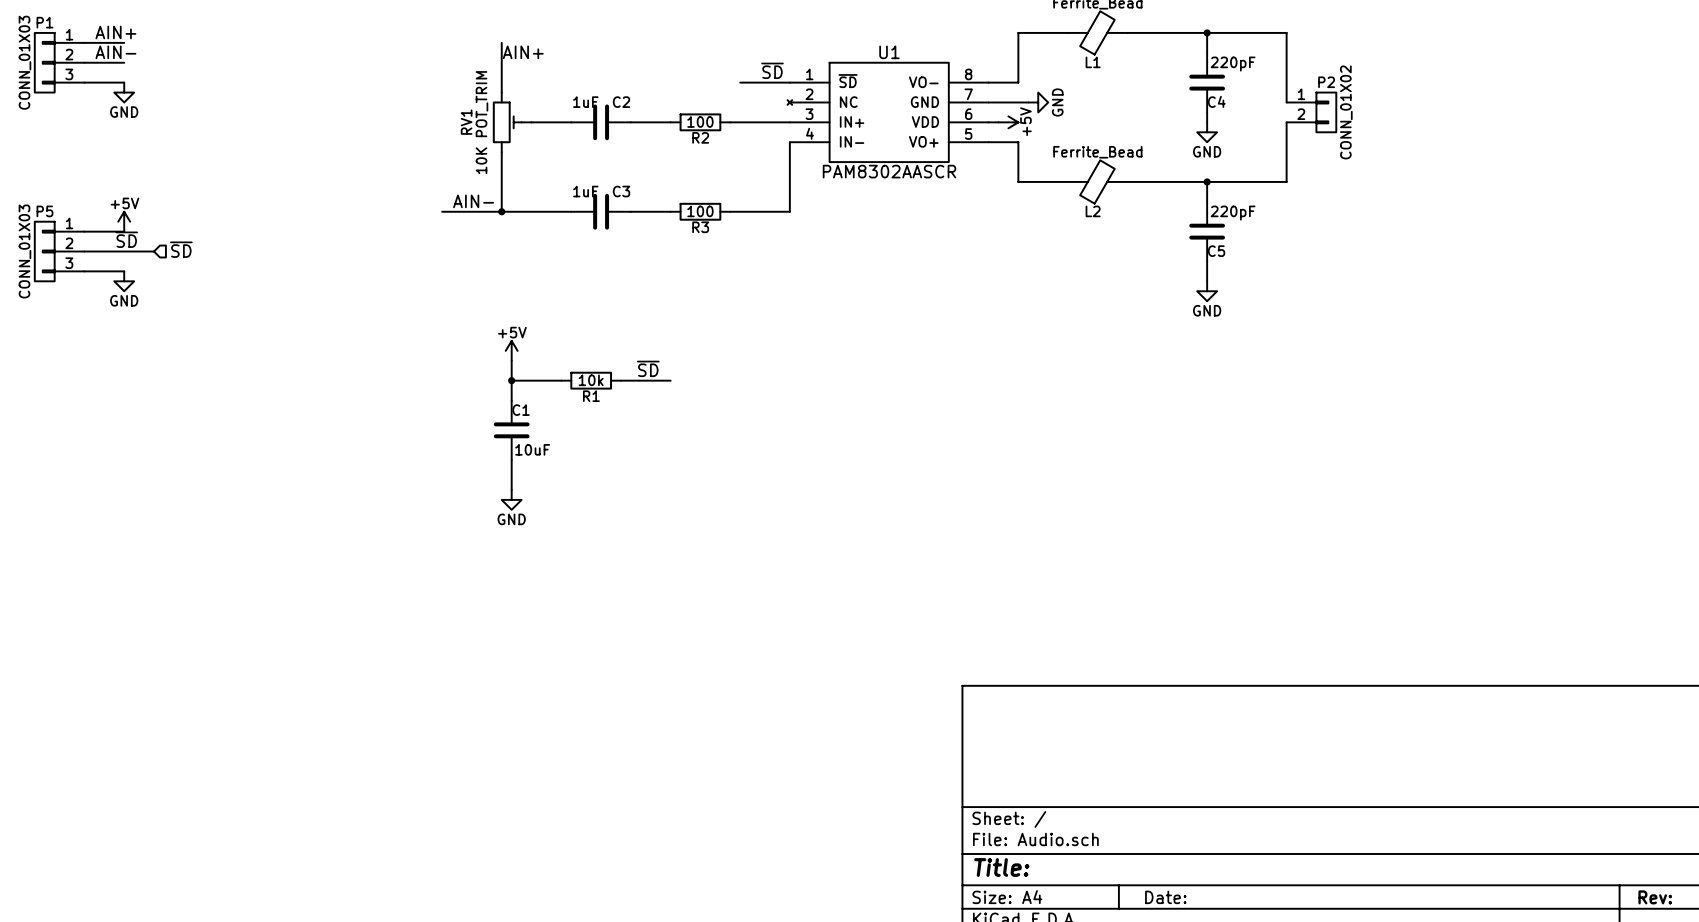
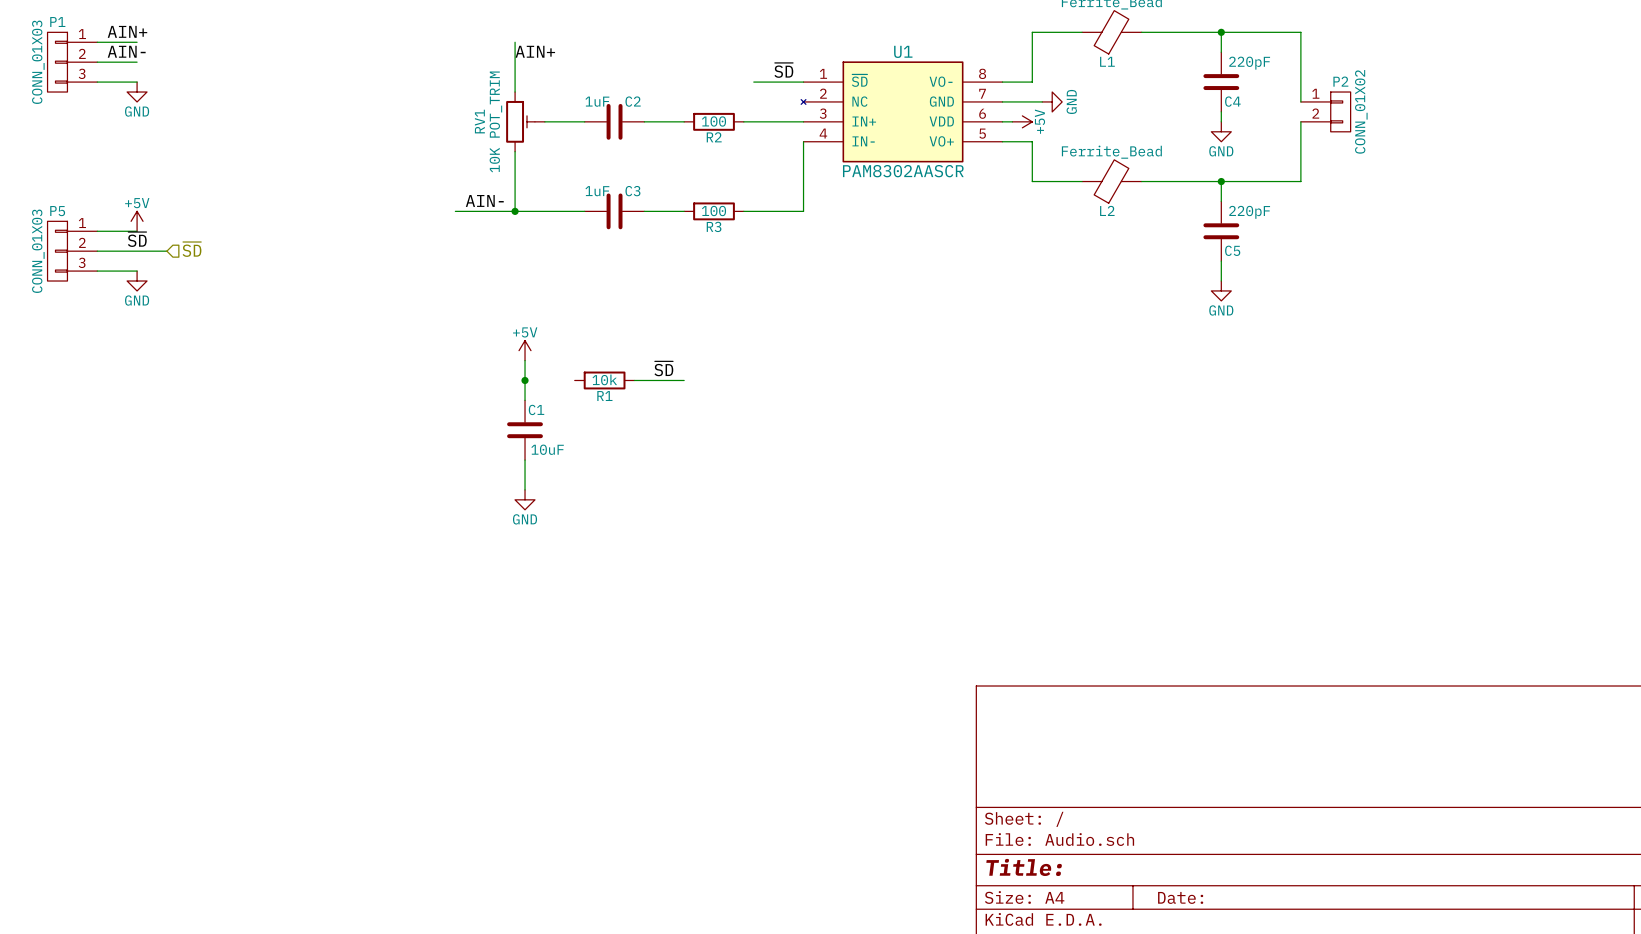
wire: (511, 380) (561, 380) -> none

